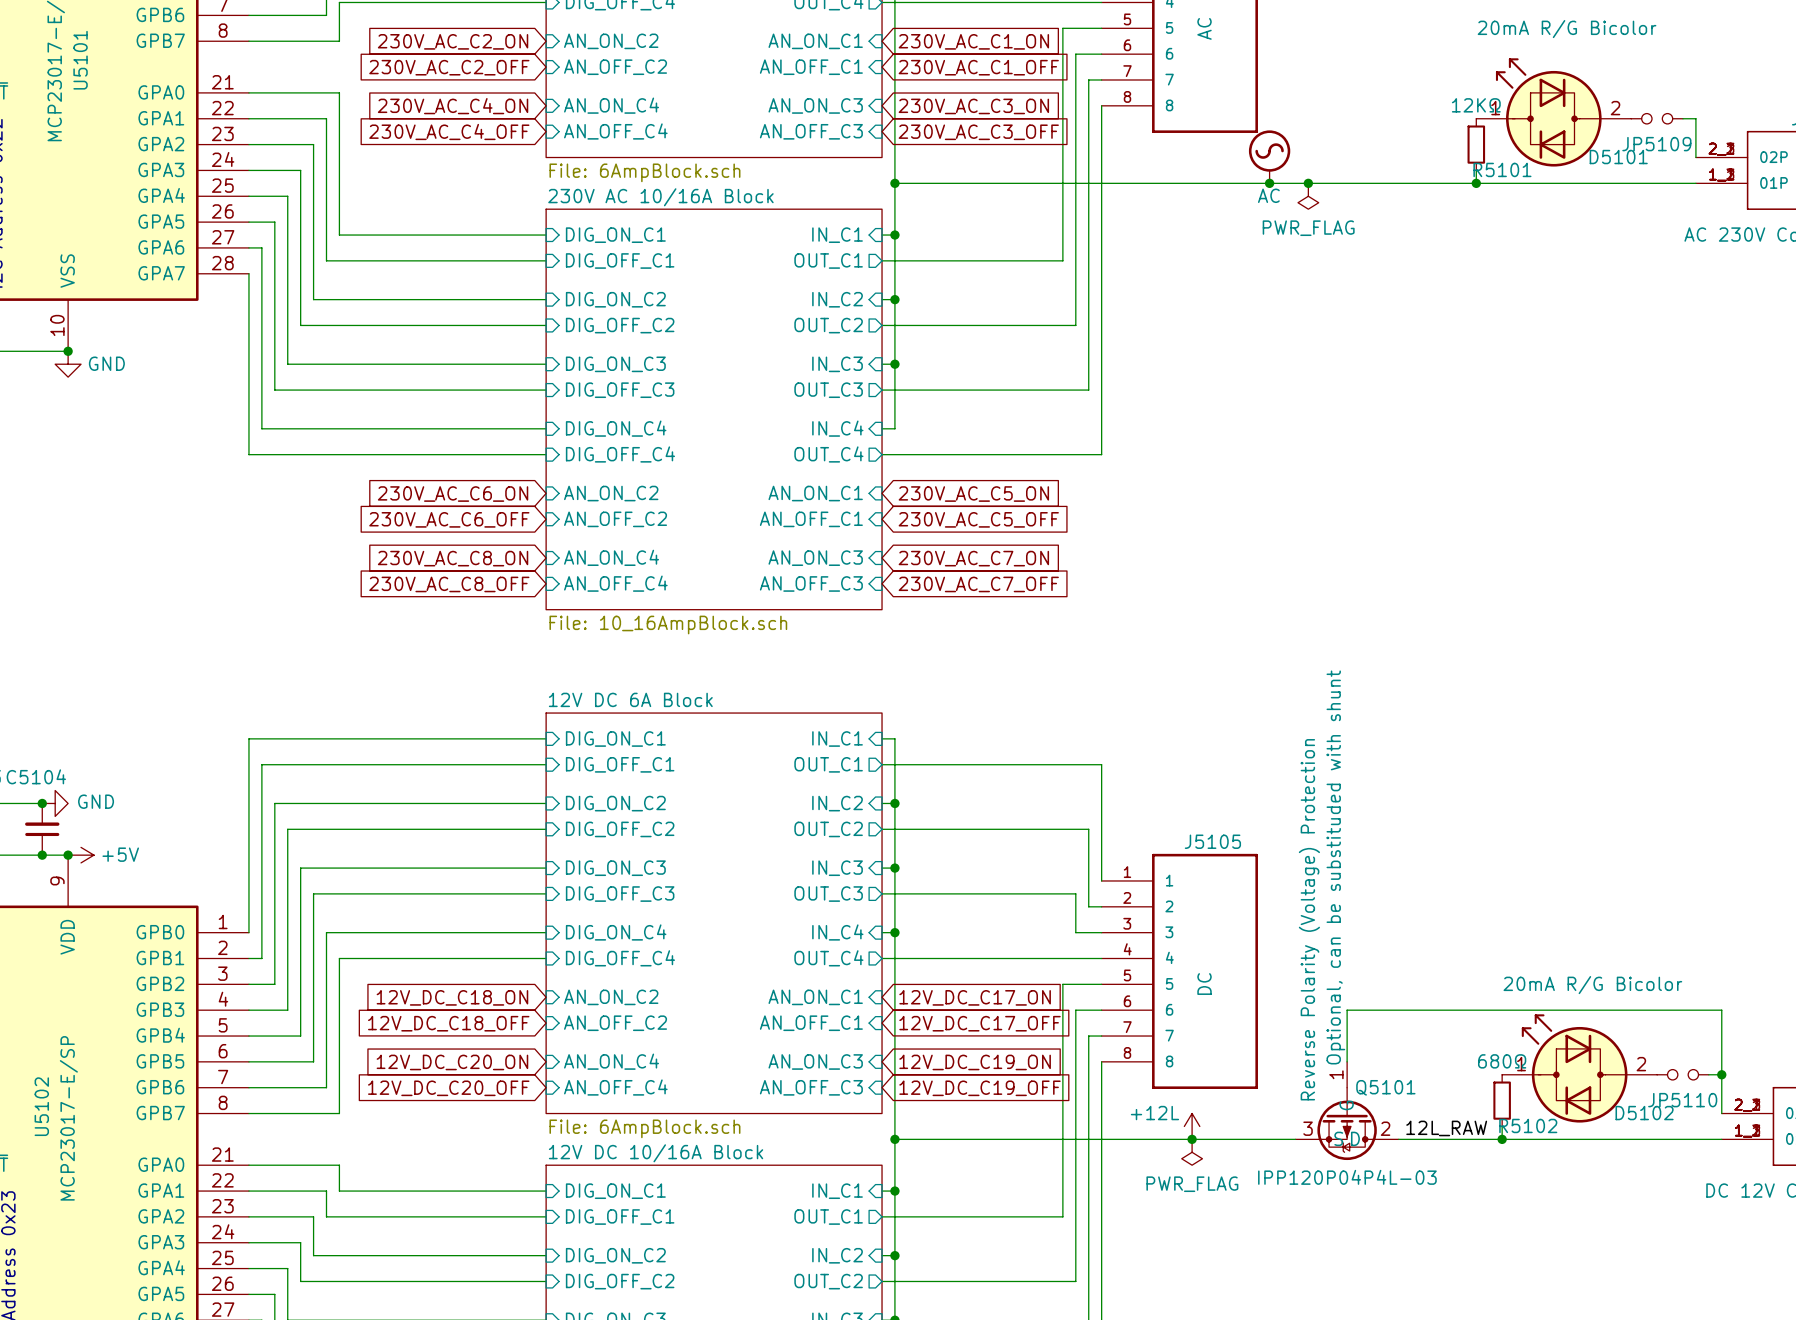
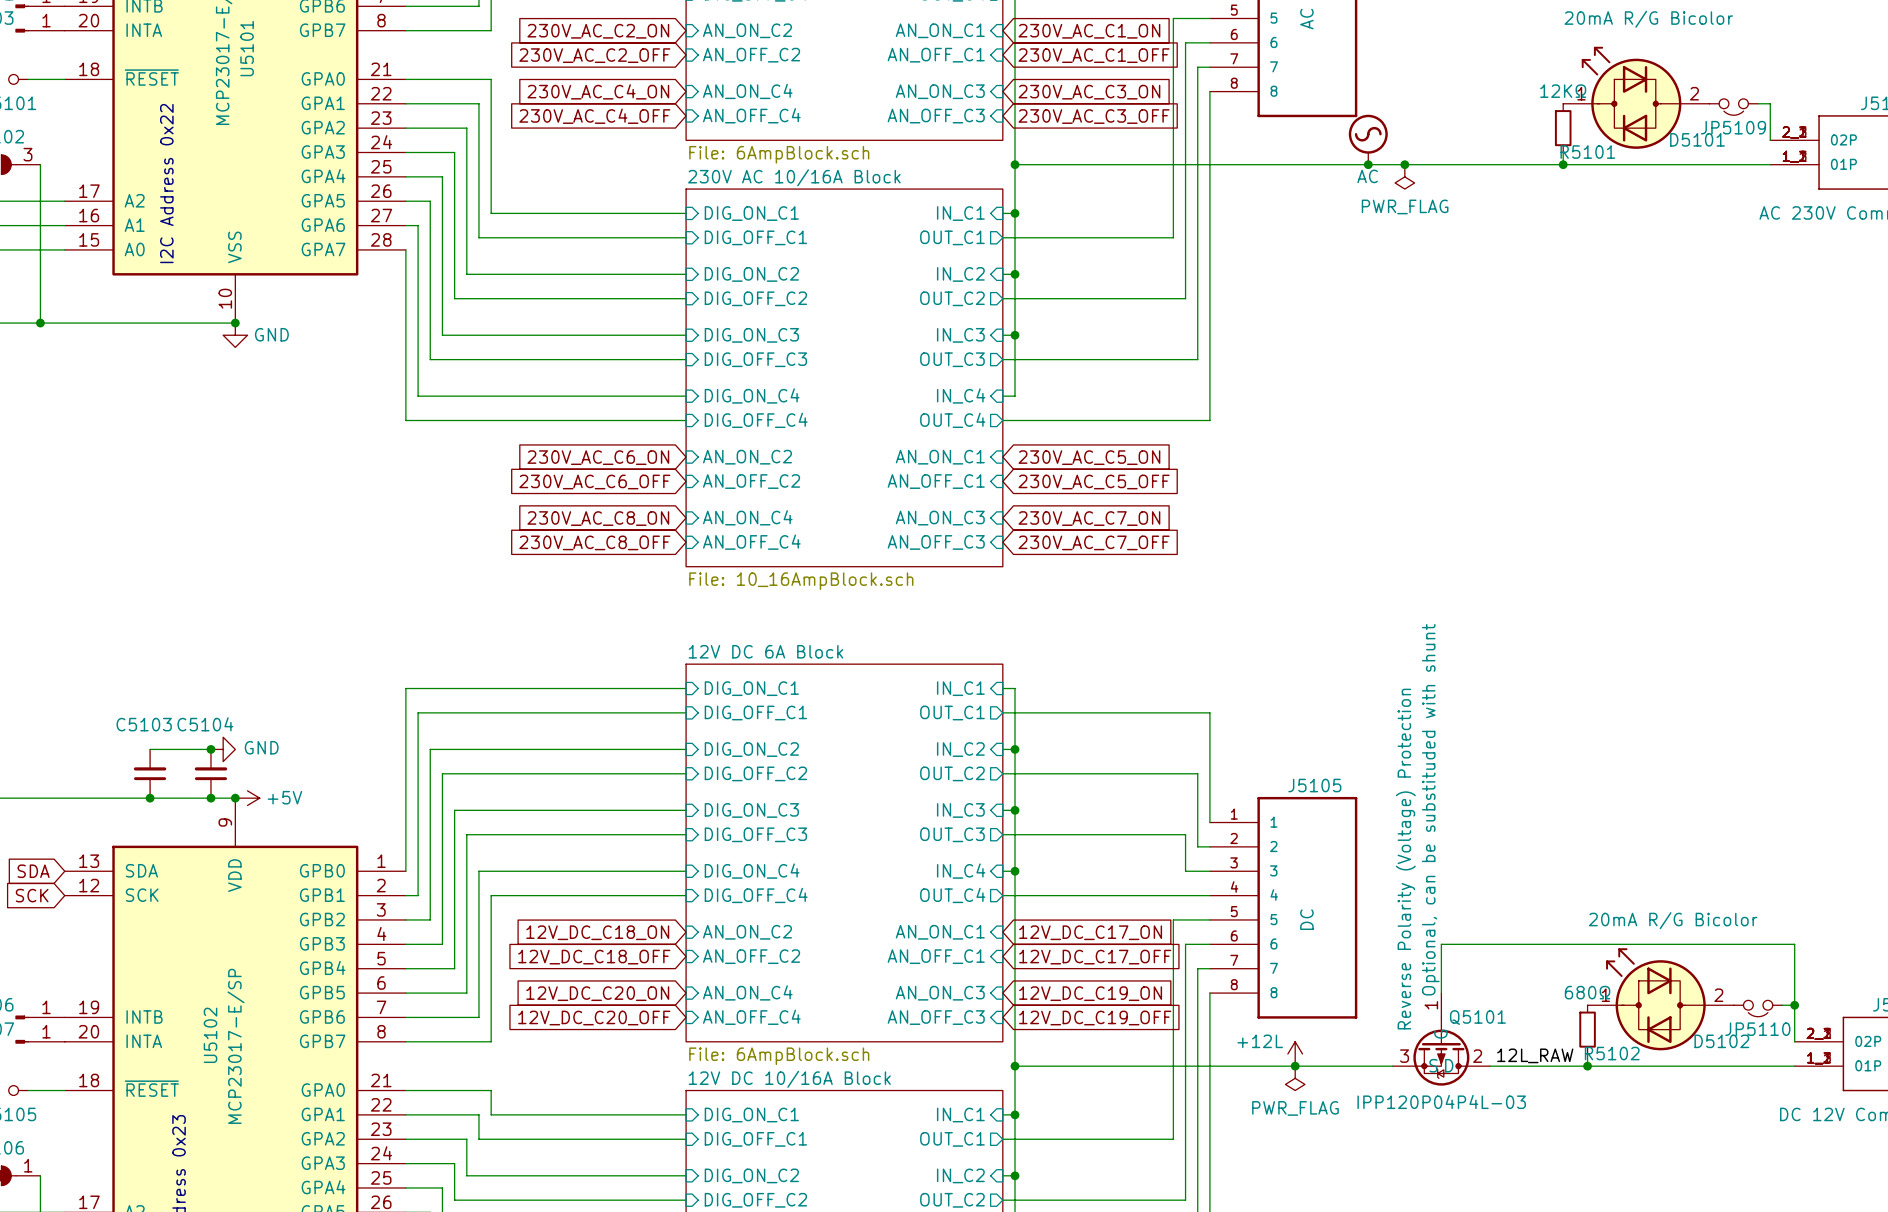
JP5109 symbol: [1631, 113, 1684, 124] -> [1709, 98, 1759, 116]
JP5110 symbol: [1657, 1069, 1709, 1080] -> [1733, 1000, 1783, 1017]

